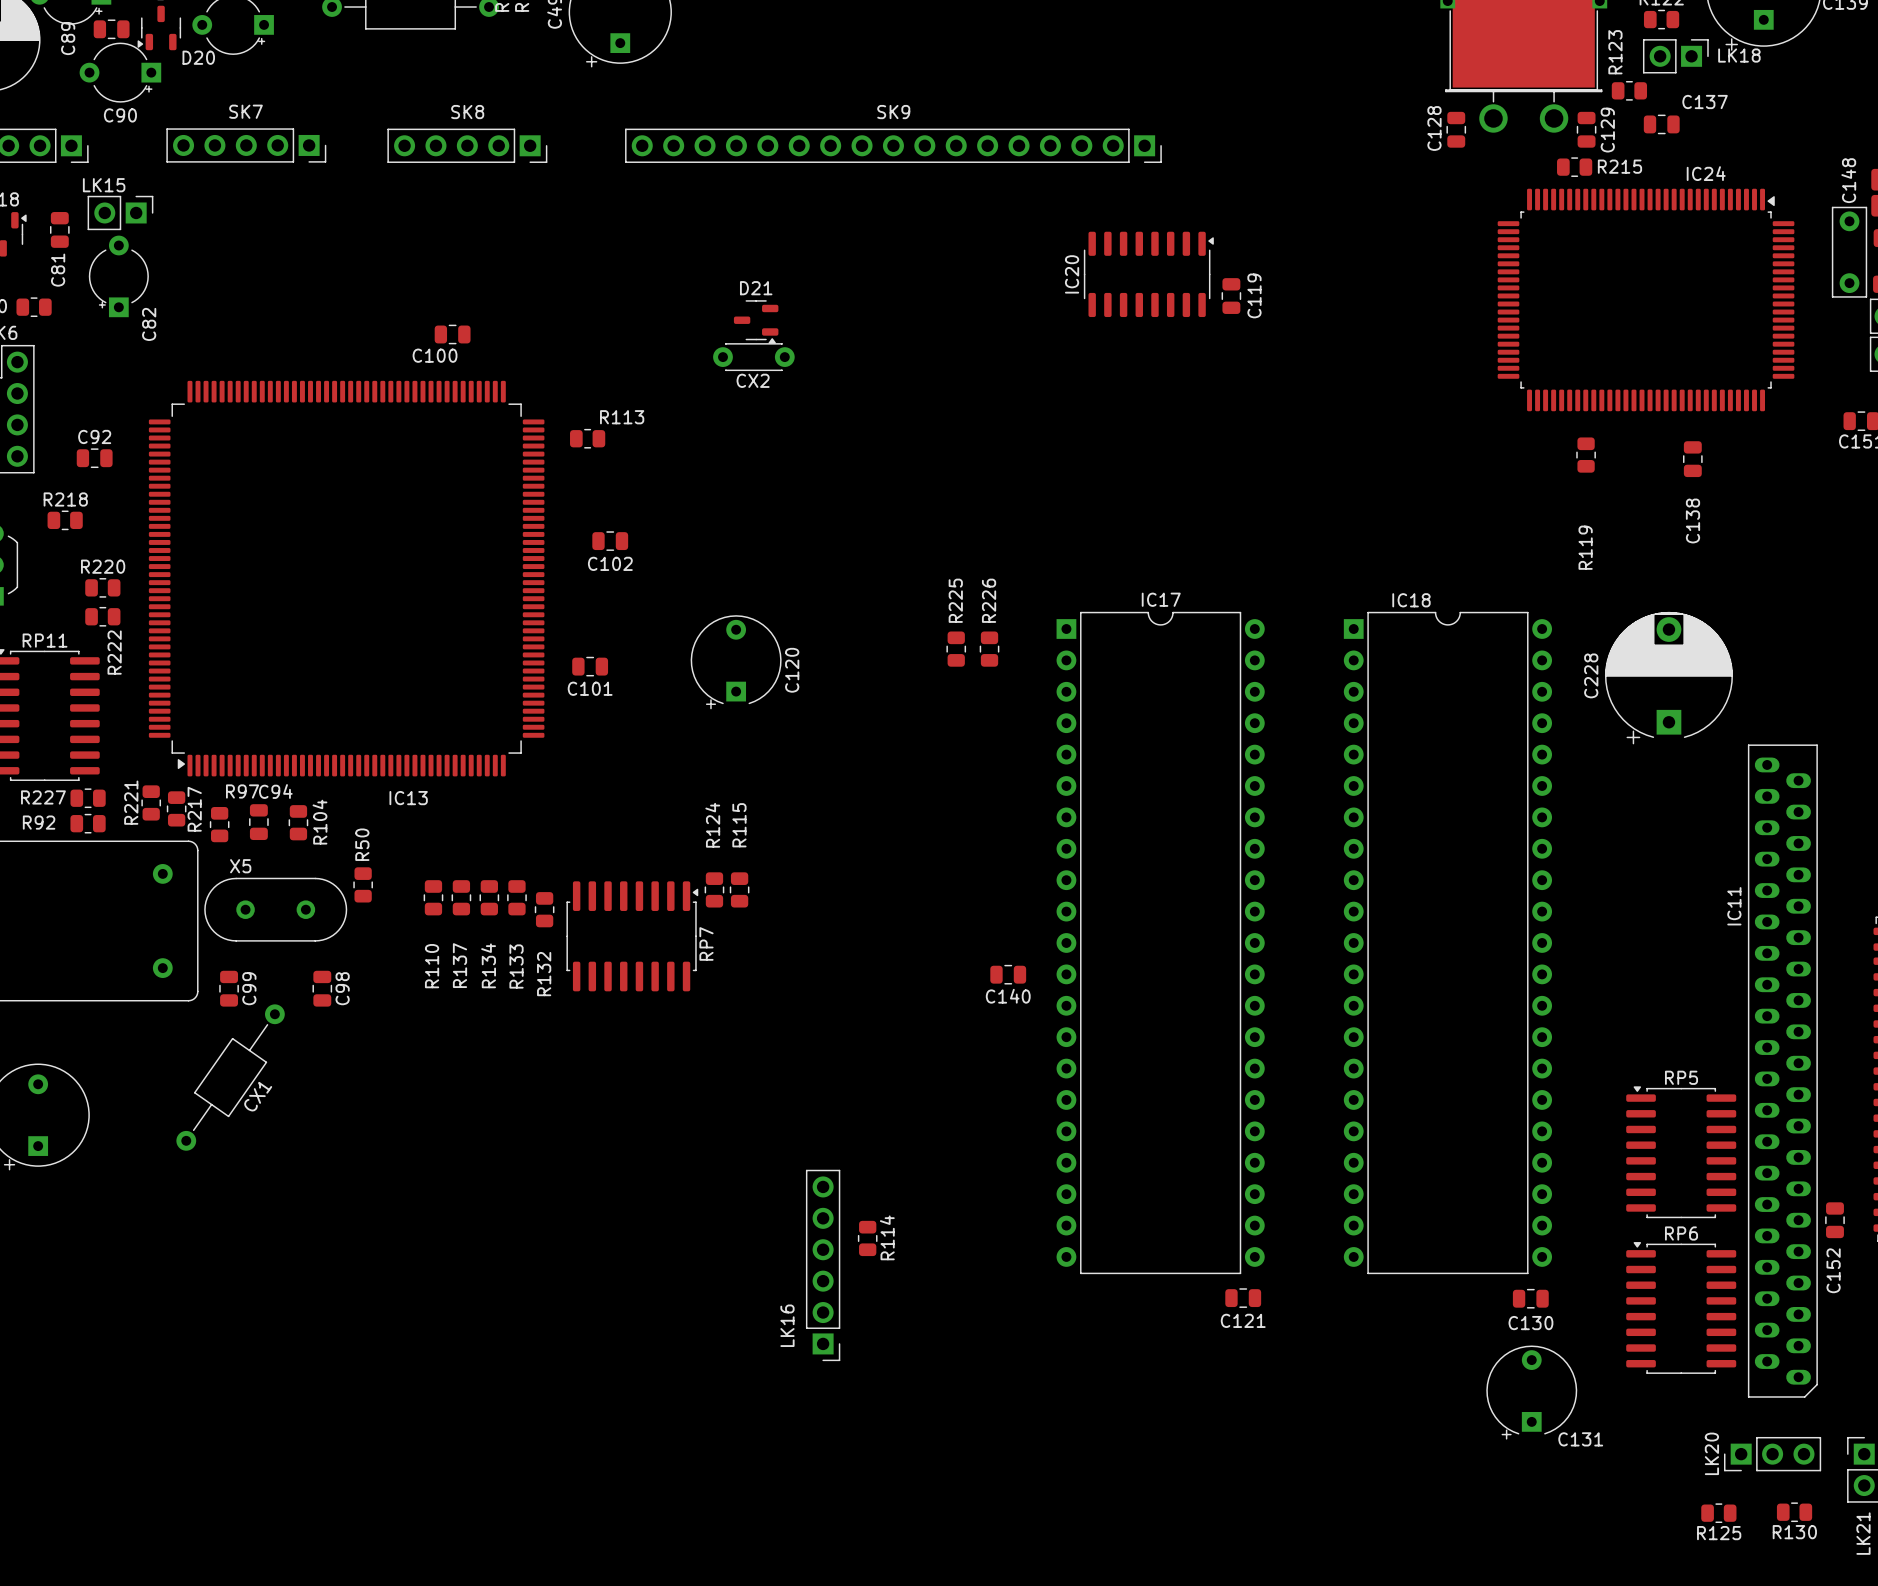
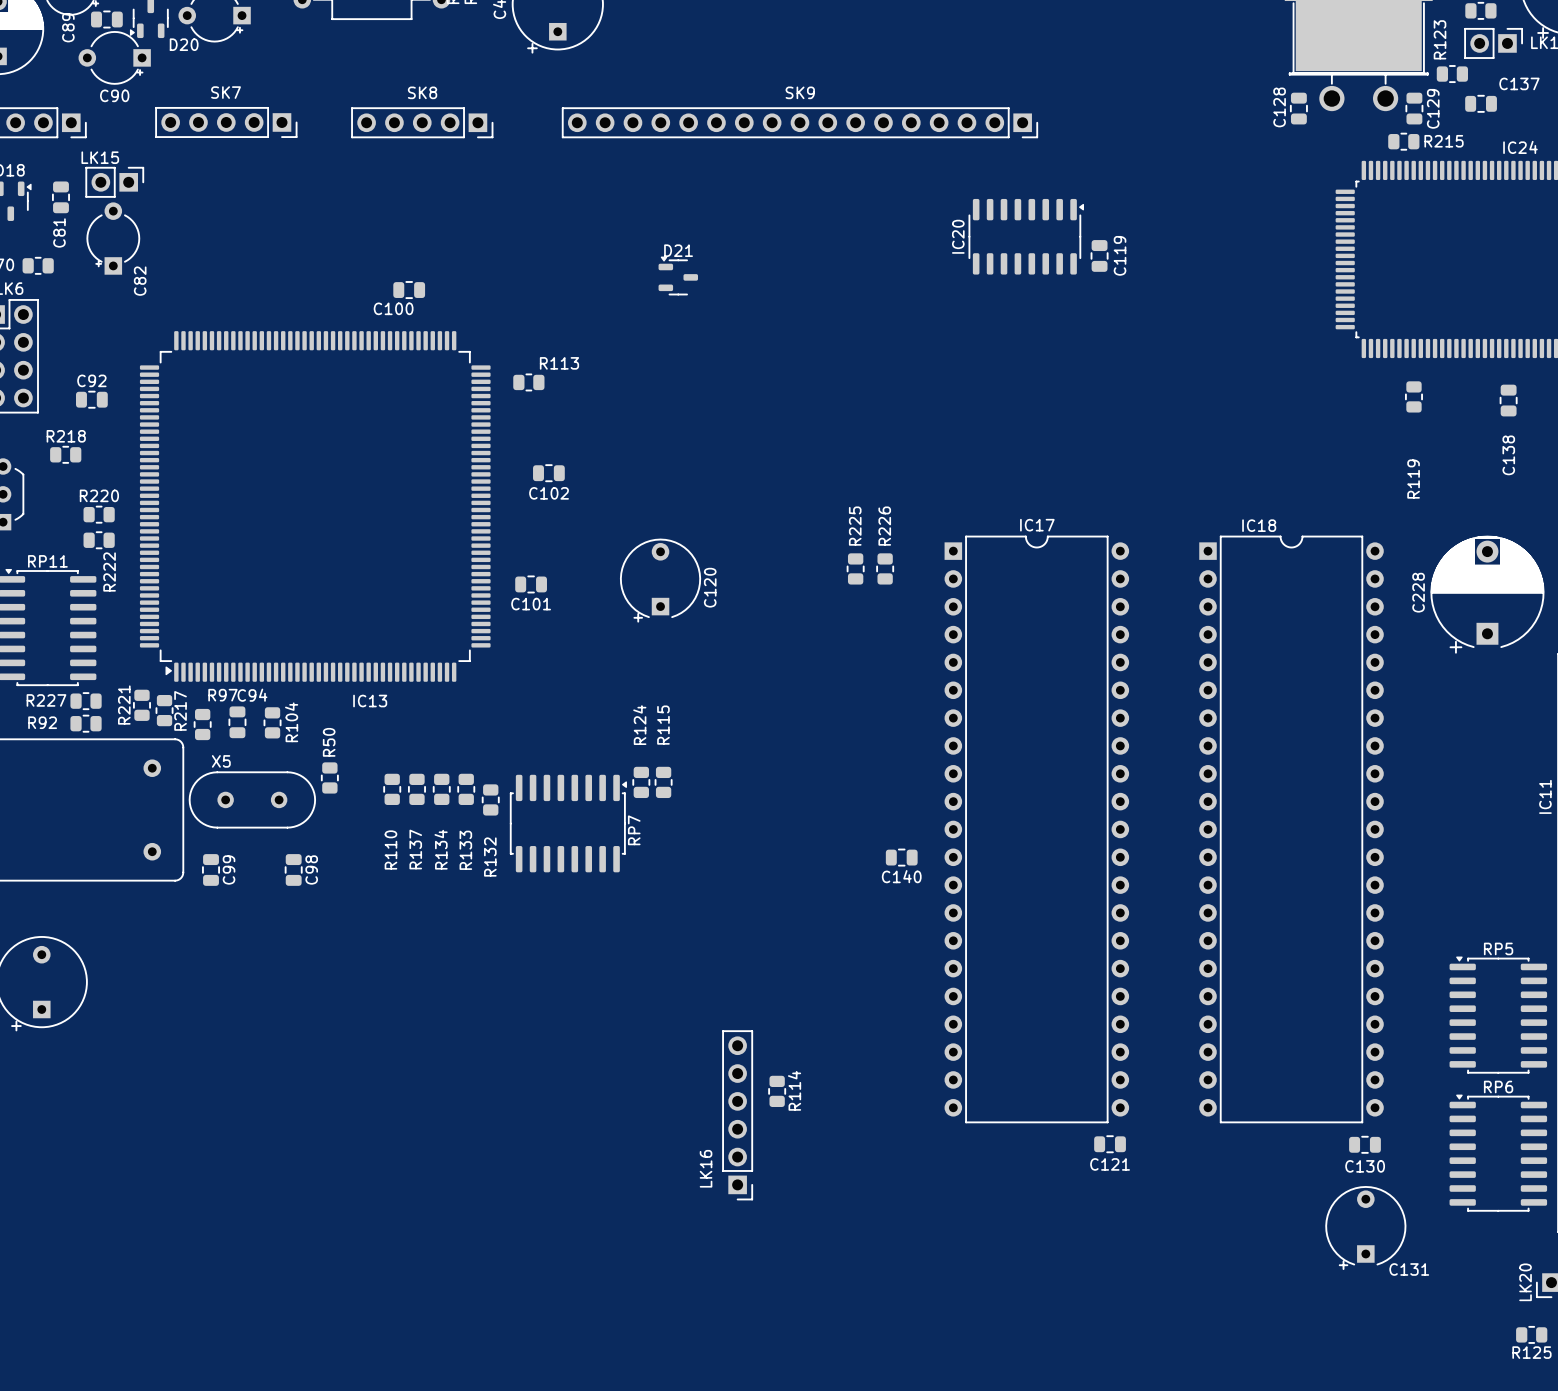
D21 rotation: 0° (756, 321) -> 180° (678, 275)
CX2: (753, 357) -> none
CX1: (230, 1077) -> none

